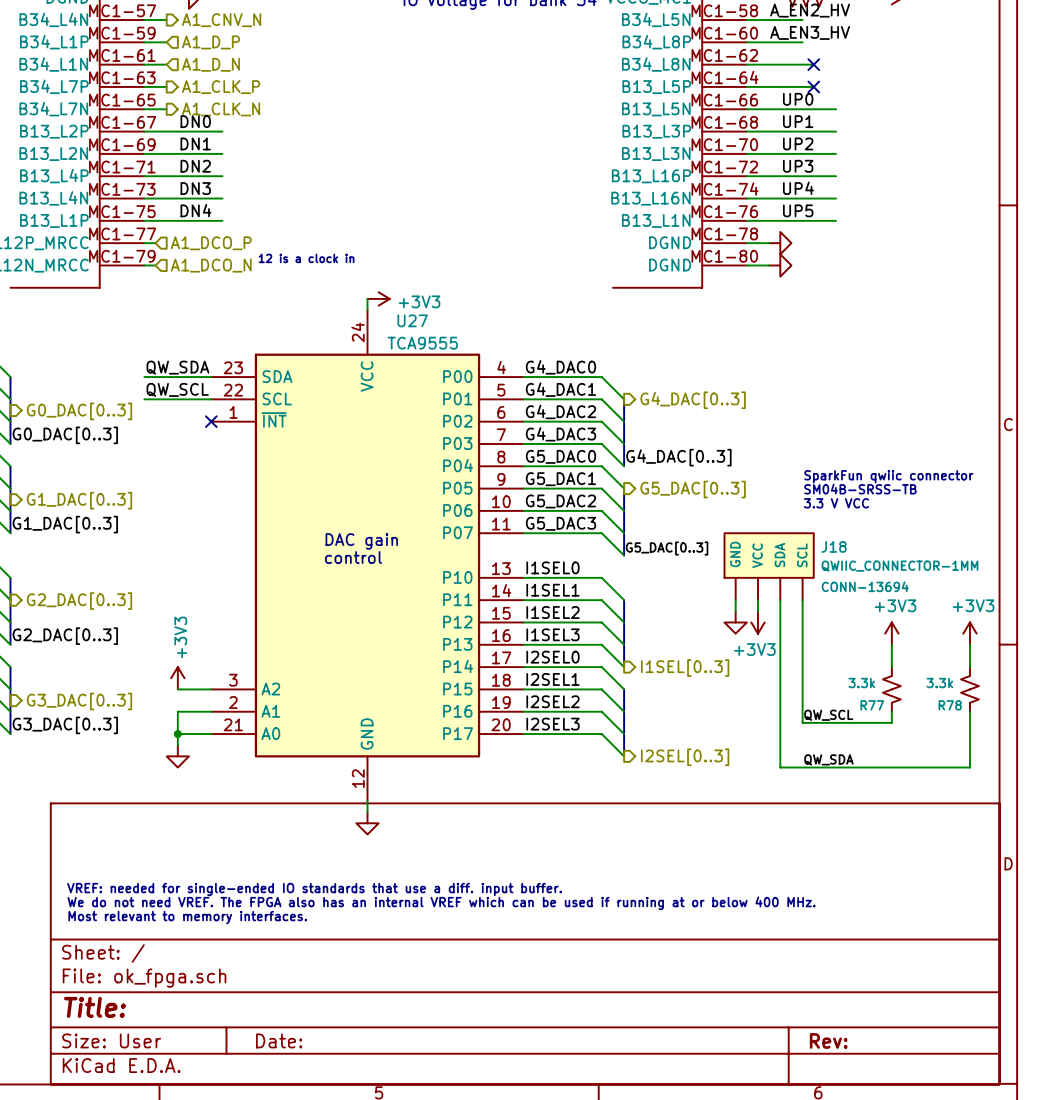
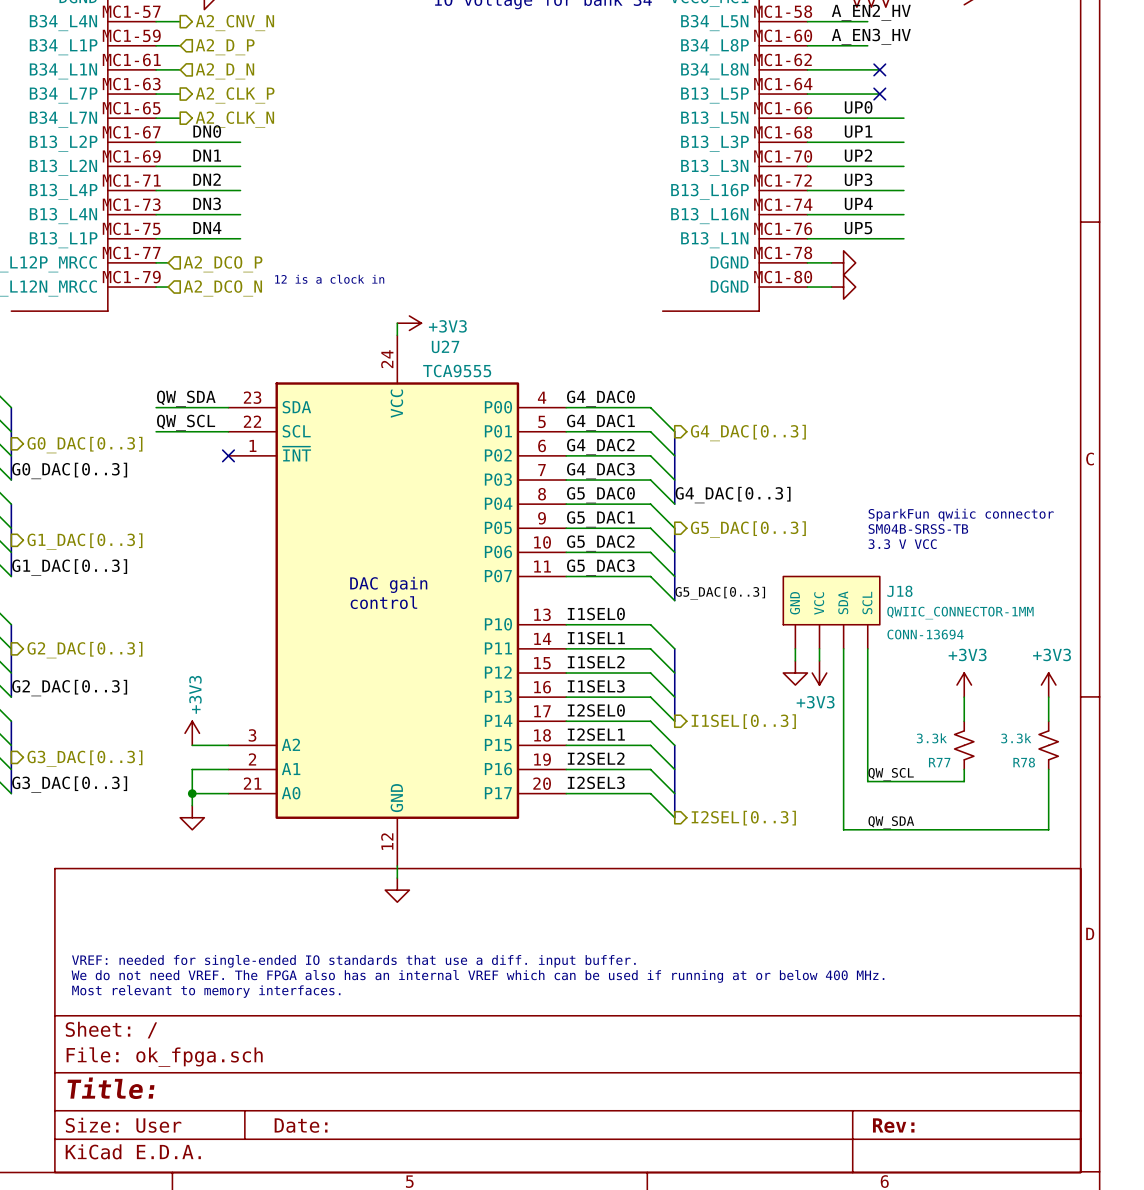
hierarchical label: A1_CNV_N (221, 20) -> A2_CNV_N (234, 23)
hierarchical label: A1_D_P (210, 42) -> A2_D_P (225, 47)
hierarchical label: A1_D_N (210, 64) -> A2_D_N (225, 71)
hierarchical label: A1_CLK_P (221, 87) -> A2_CLK_P (235, 95)
hierarchical label: A1_CLK_N (221, 109) -> A2_CLK_N (234, 119)
hierarchical label: A1_DCO_P (211, 243) -> A2_DCO_P (223, 264)
hierarchical label: A1_DCO_N (211, 265) -> A2_DCO_N (222, 288)

